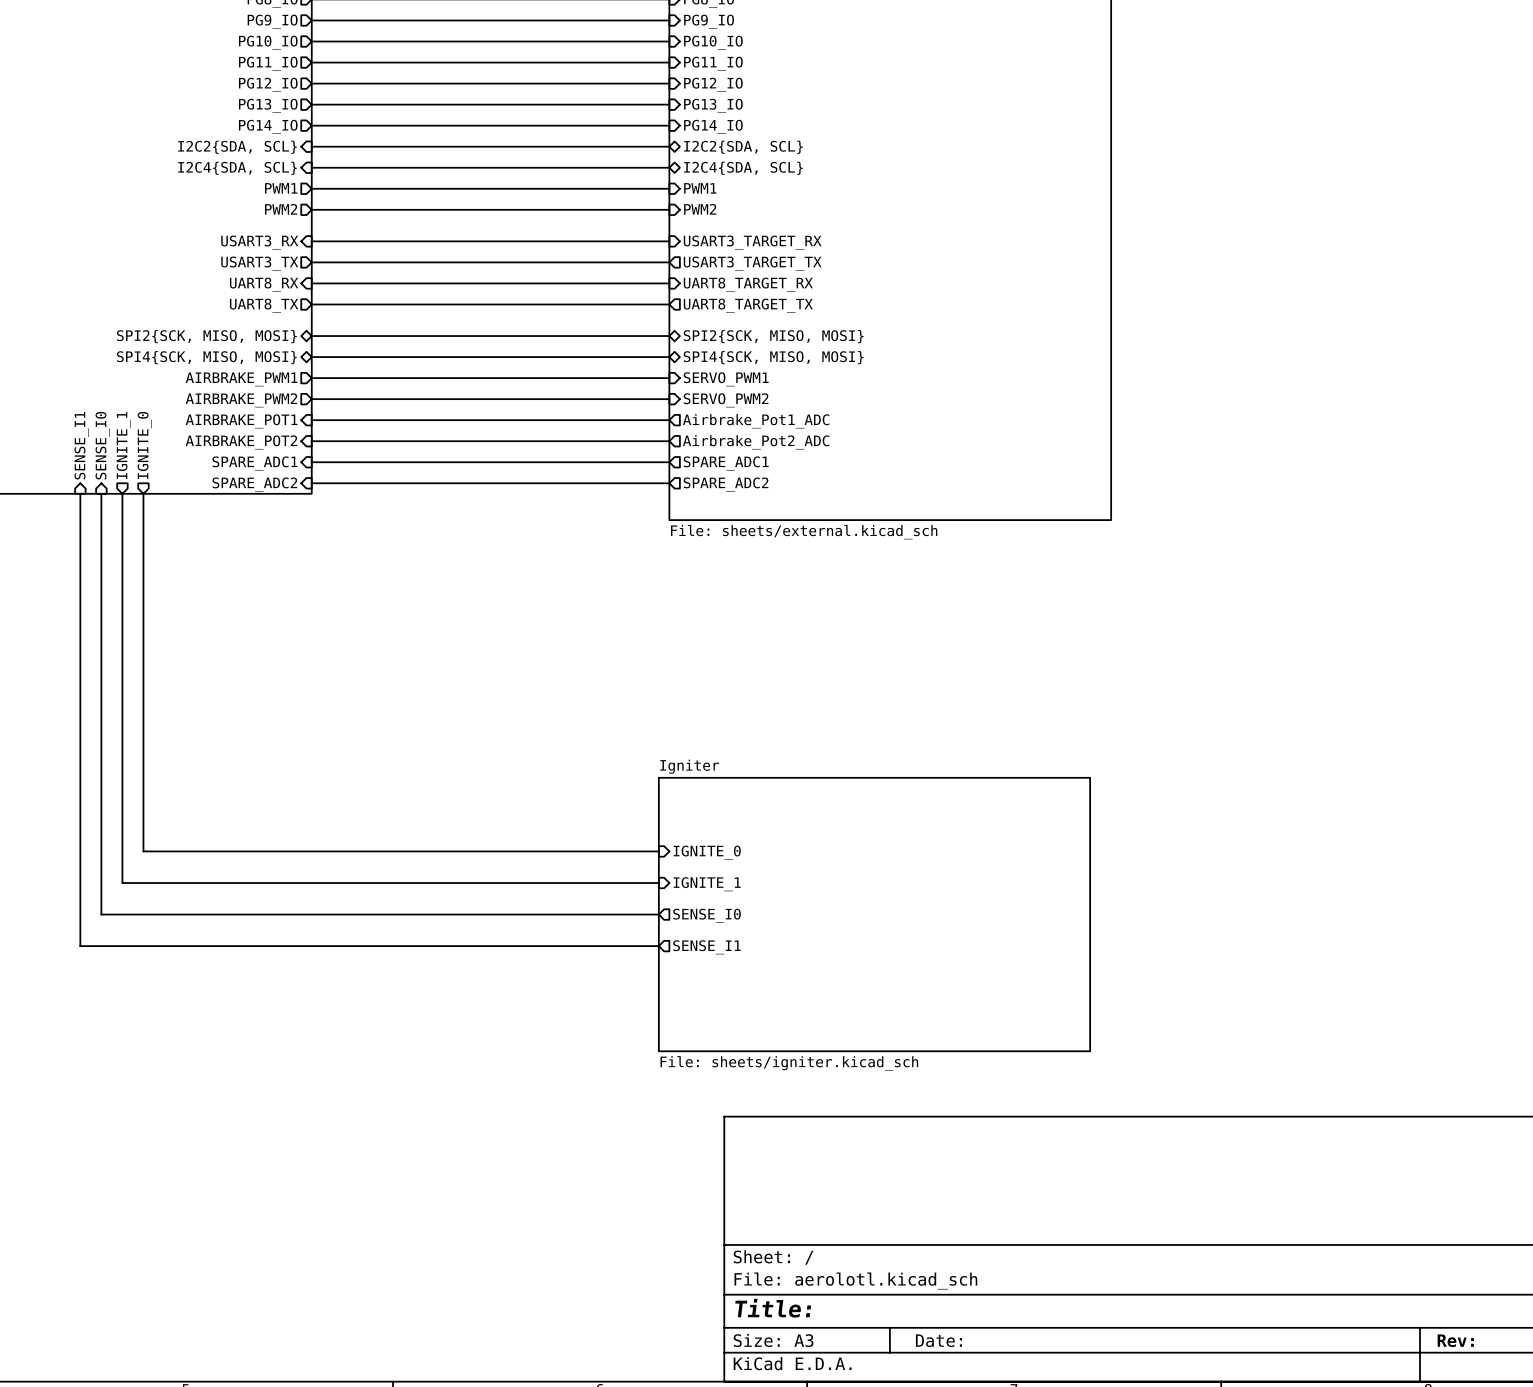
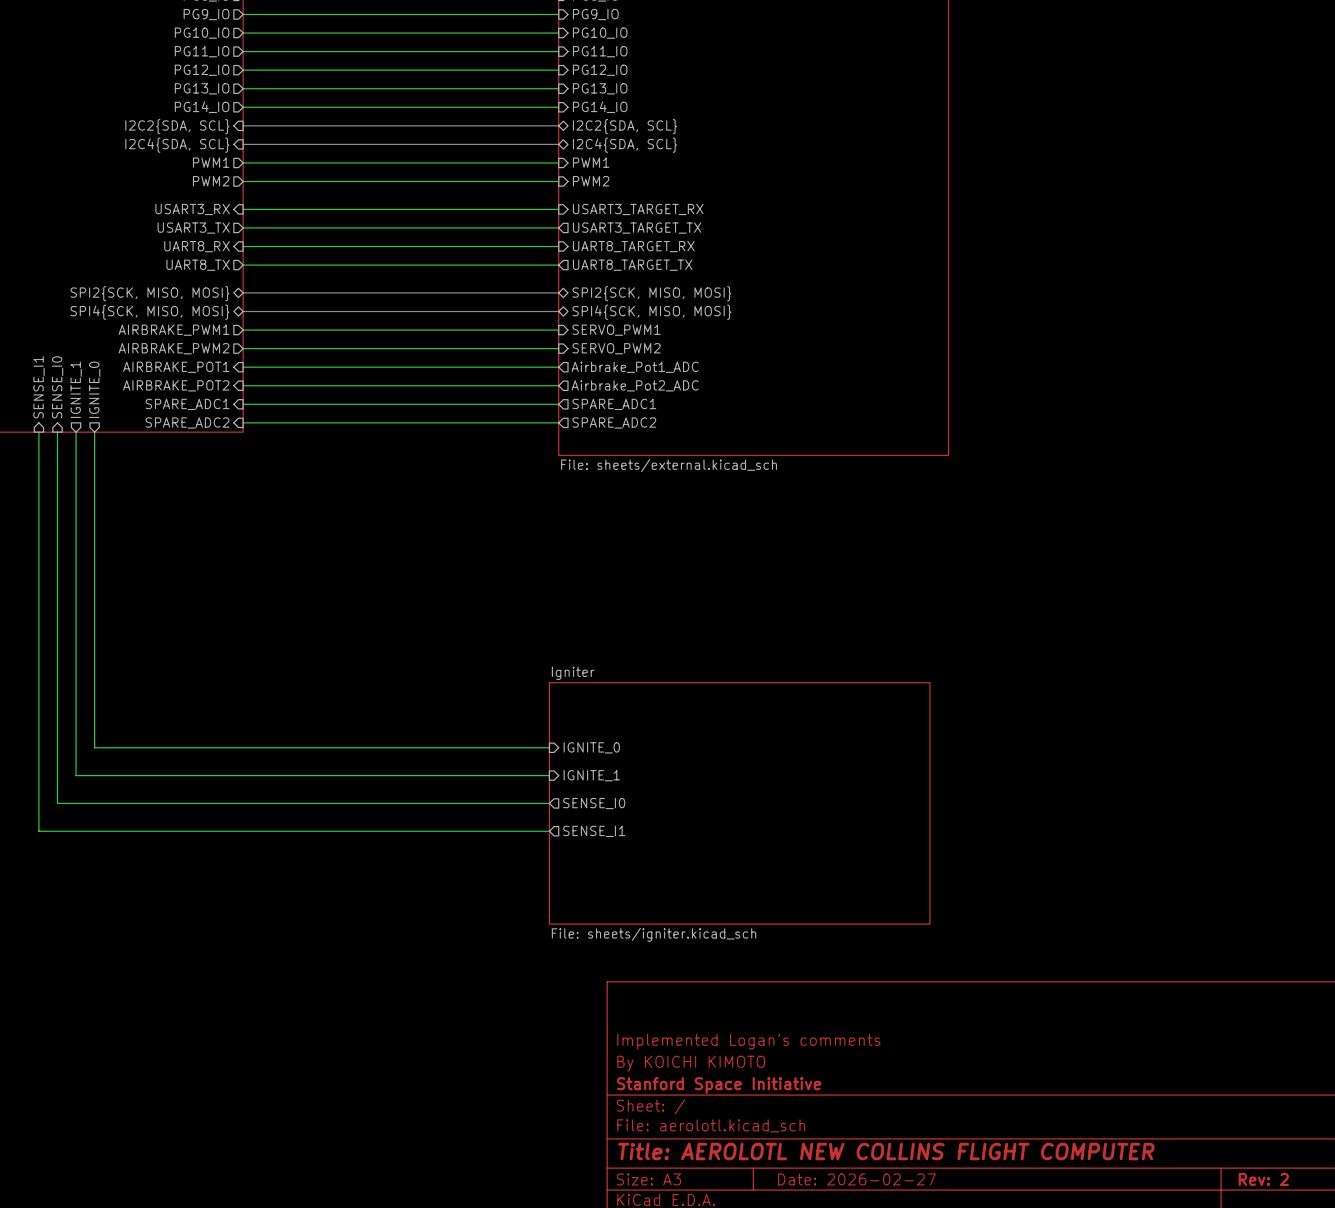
title block: none -> Implemented Logan's comments (748, 1041)
title block: none -> By KOICHI KIMOTO (691, 1063)
title block: none -> Stanford Space Initiative (719, 1085)
title block: Title: (773, 1308) -> Title: AEROLOTL NEW COLLINS FLIGHT COMPUTER (886, 1151)
title block: Date: (938, 1340) -> Date: 2026-02-27 (856, 1179)
title block: Rev: (1455, 1340) -> Rev: 2 (1263, 1179)

